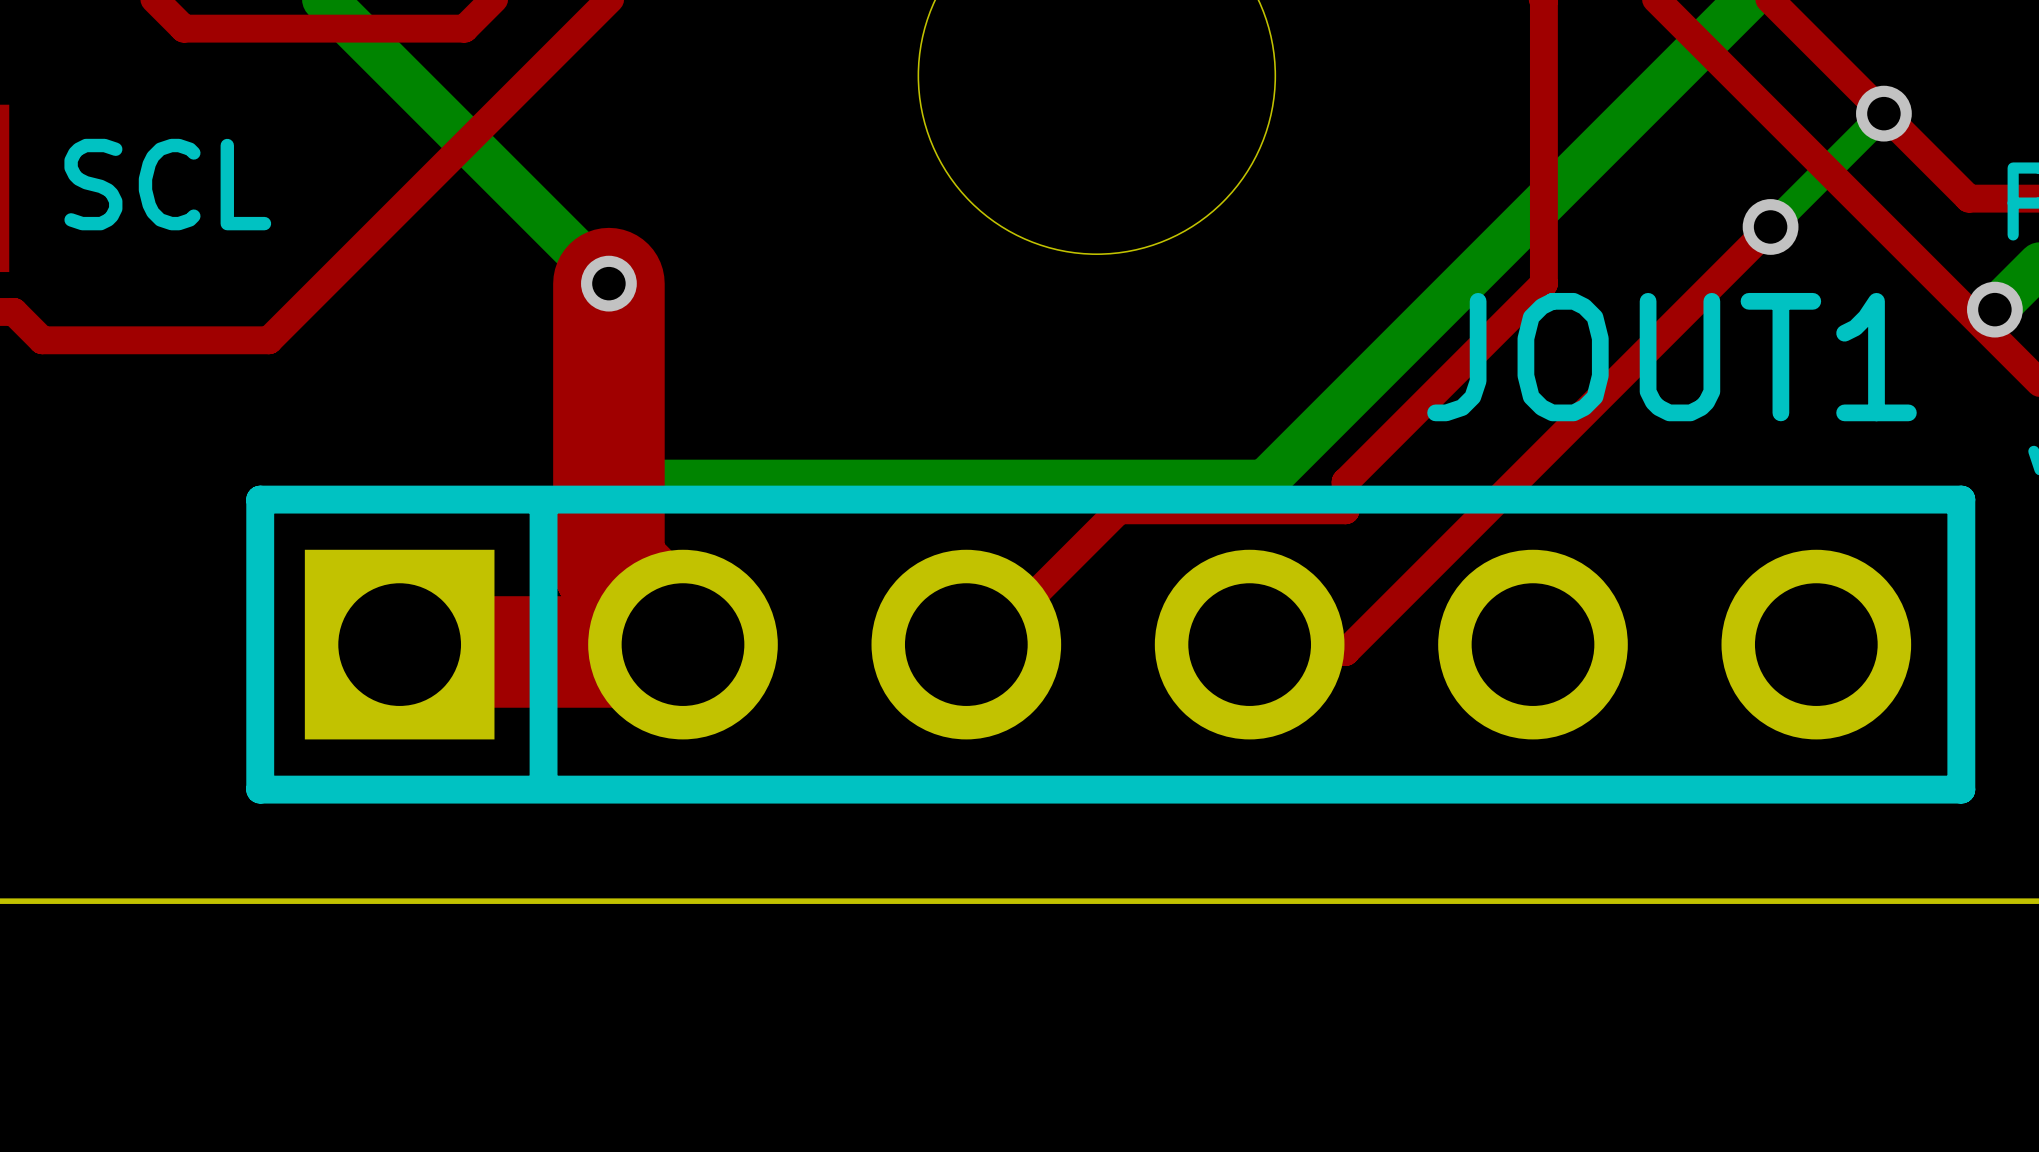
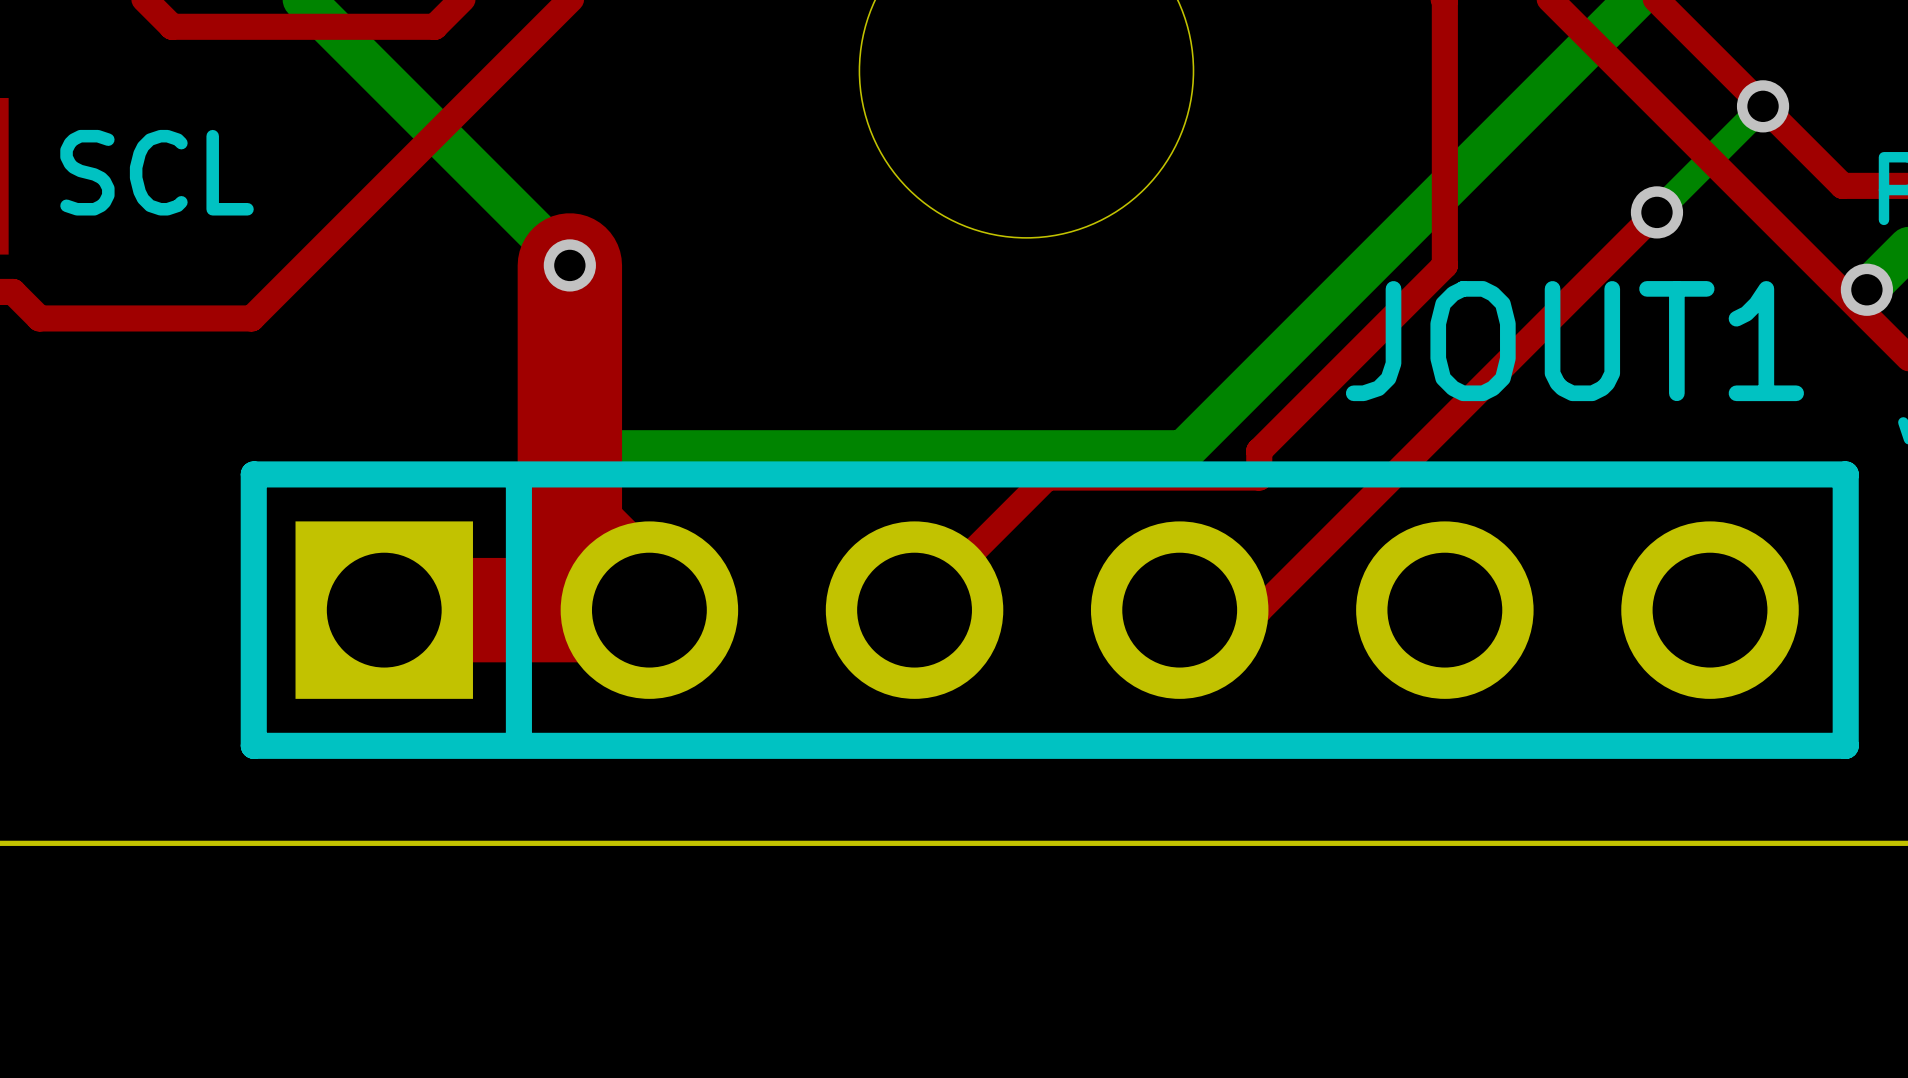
JOUT1 position: (1110, 644) -> (1049, 610)

